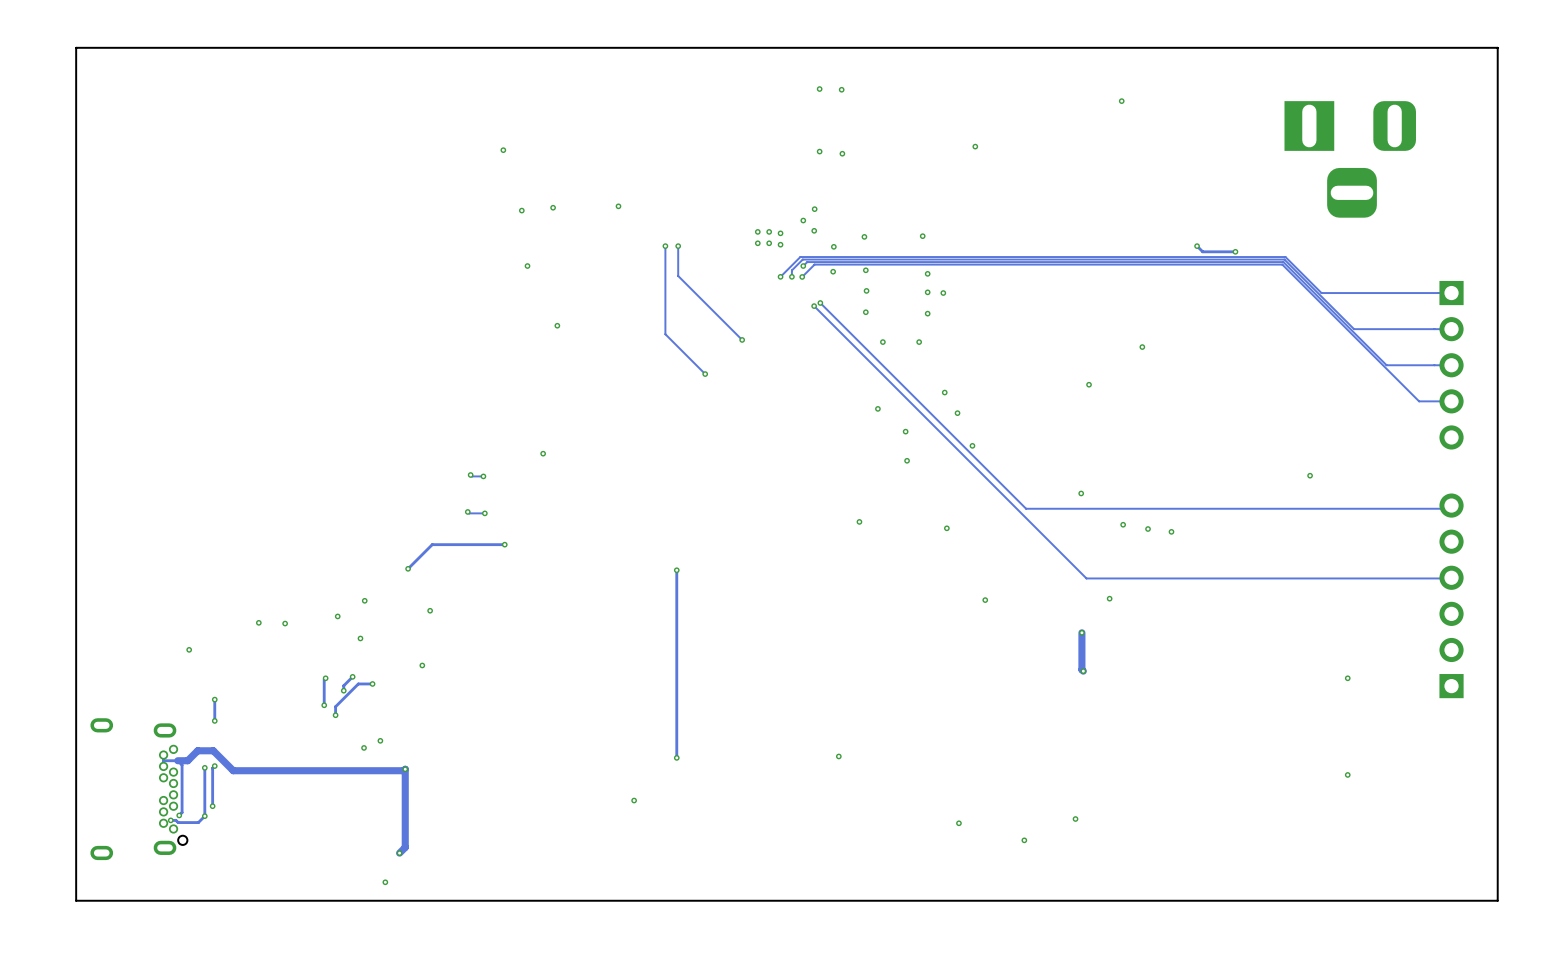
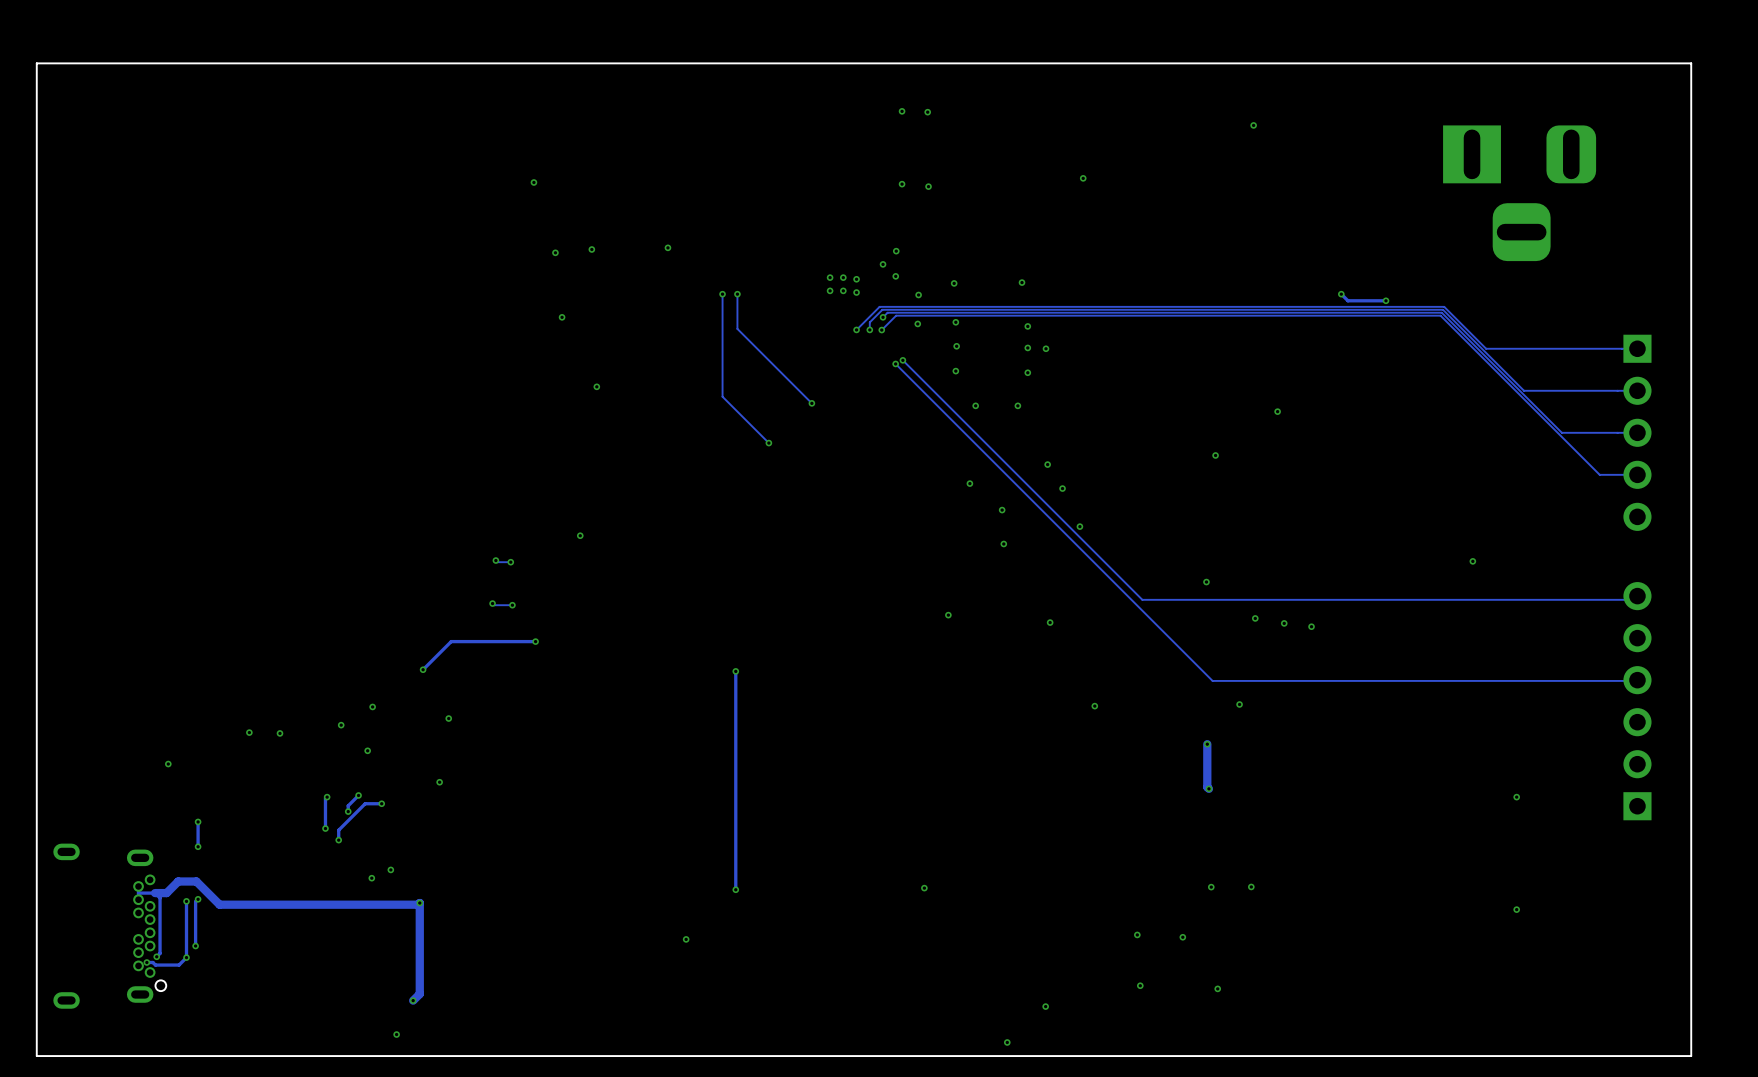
via: none -> (1211, 887)
via: none -> (1251, 886)
via: none -> (1137, 934)
via: none -> (1182, 937)
via: (1075, 819) -> none
via: (958, 823) -> none
via: none -> (1217, 988)
via: none -> (1045, 1006)
via: none -> (1007, 1042)

